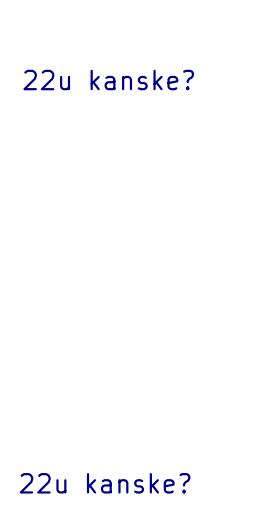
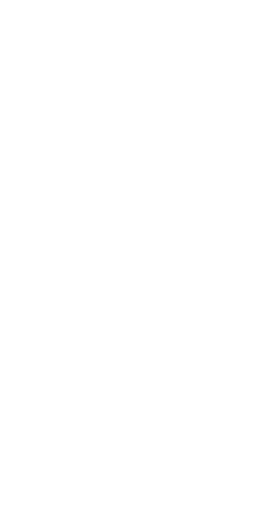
text: 22u kanske? (108, 80) -> none
text: 22u kanske? (105, 483) -> none

